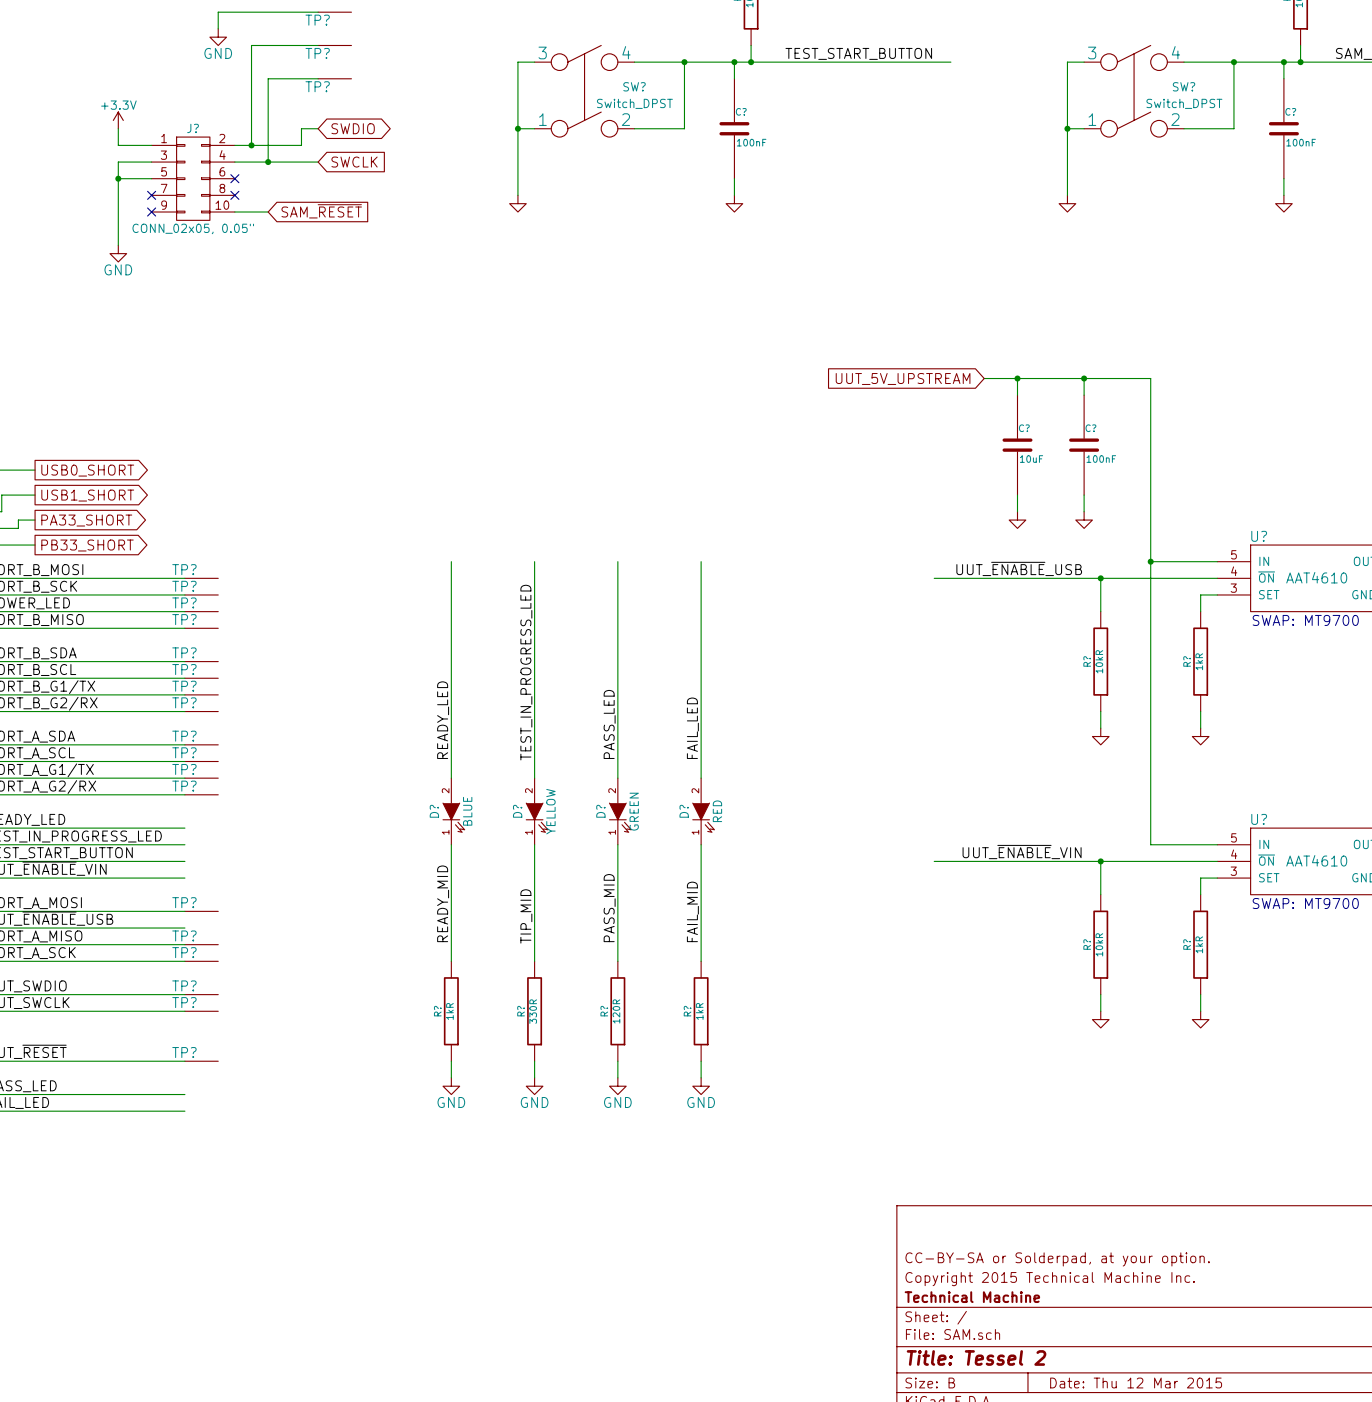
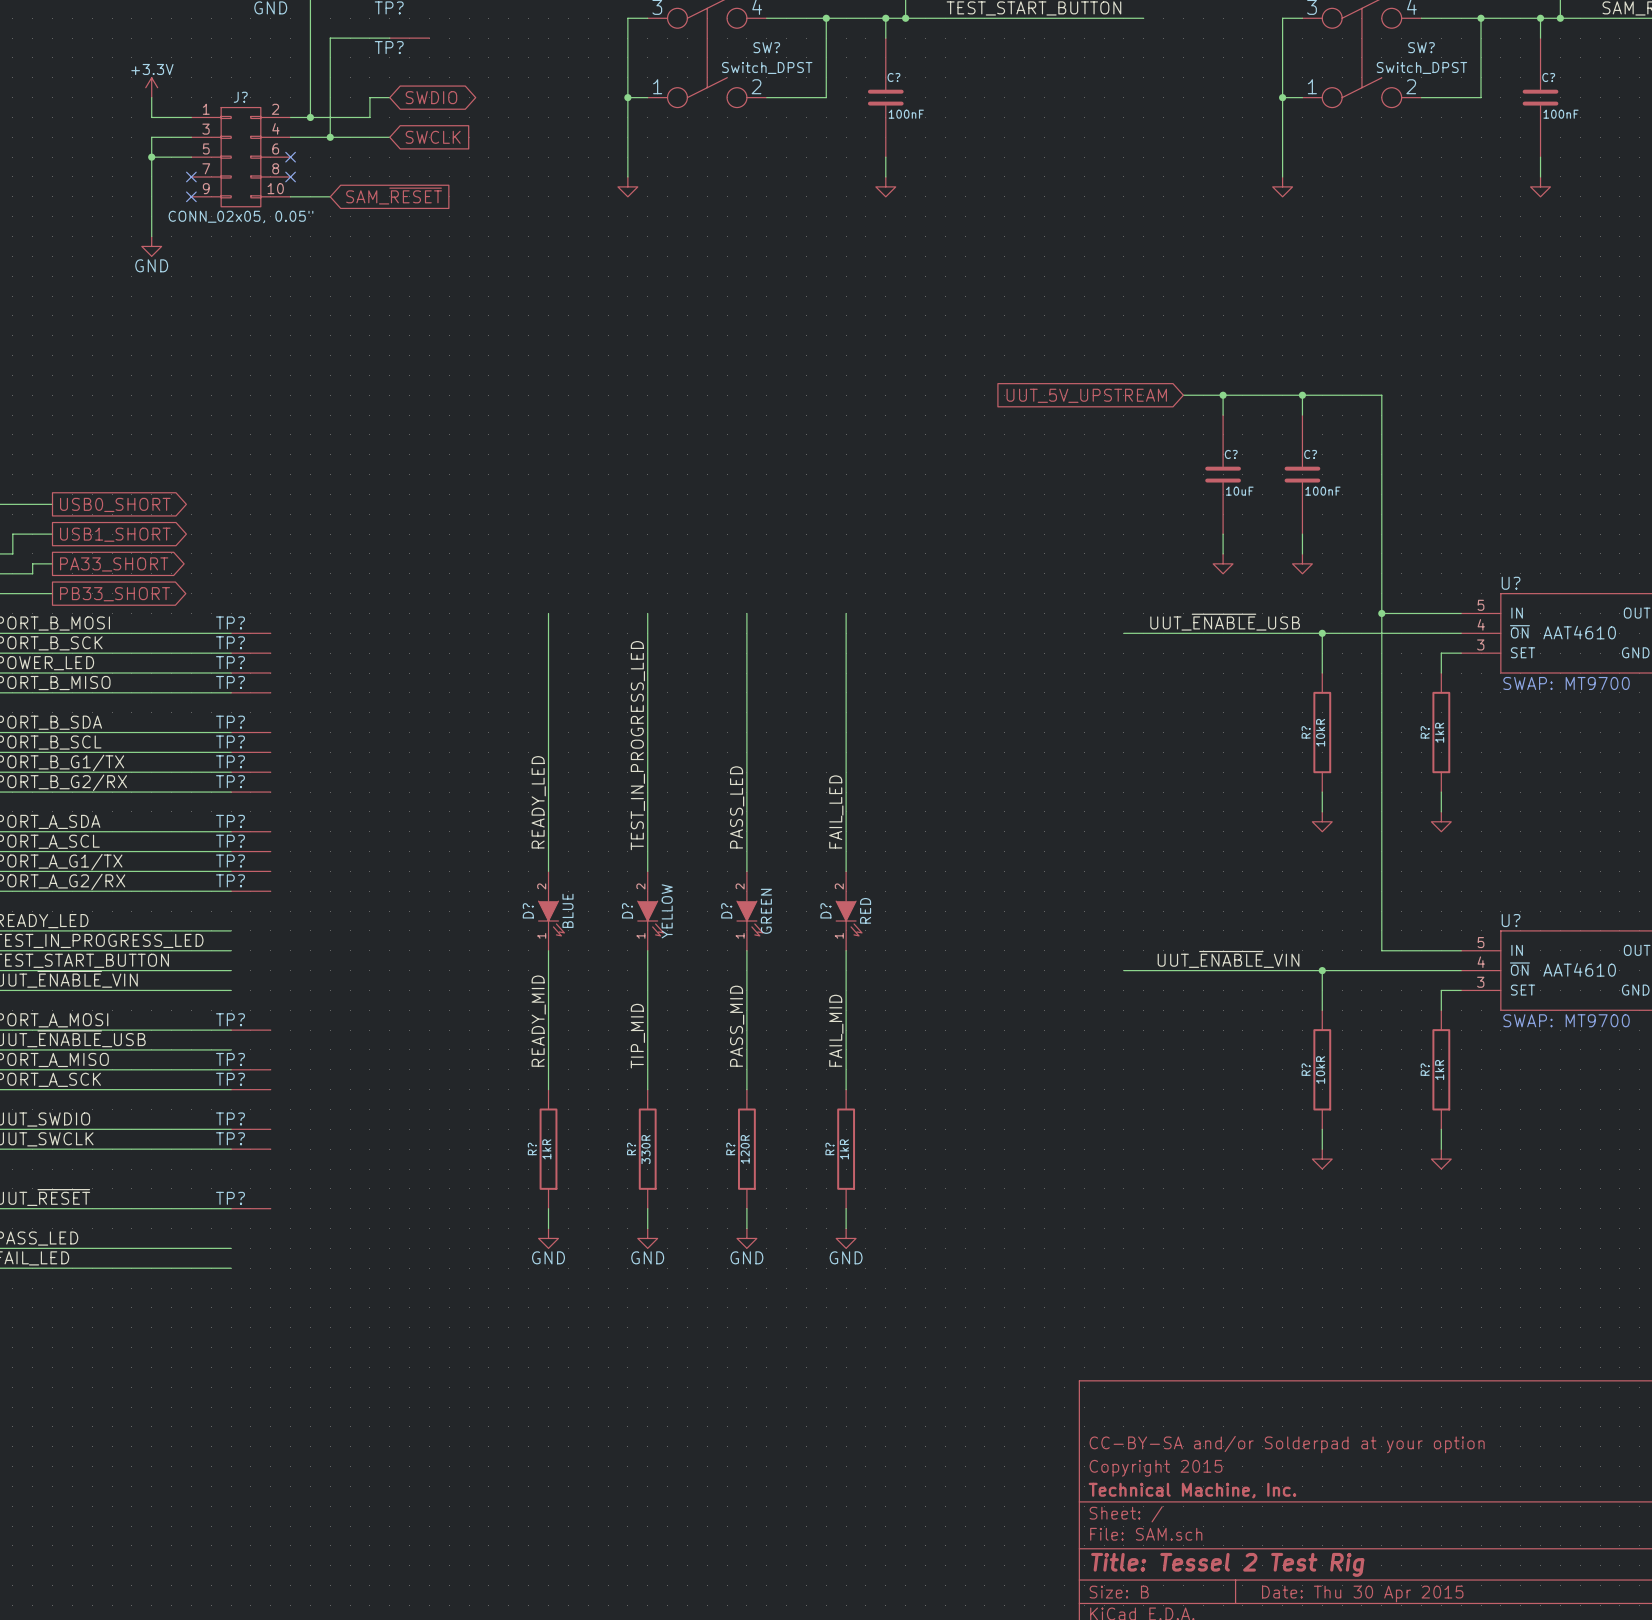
title block: CC-BY-SA or Solderpad, at your option. (1057, 1259) -> CC-BY-SA and/or Solderpad at your option (1287, 1444)
title block: Copyright 2015 Technical Machine Inc. (1050, 1279) -> Copyright 2015 (1156, 1468)
title block: Technical Machine (972, 1297) -> Technical Machine, Inc. (1192, 1490)
title block: Title: Tessel 2 (976, 1357) -> Title: Tessel 2 Test Rig (1227, 1564)
title block: Date: Thu 12 Mar 2015 (1136, 1383) -> Date: Thu 30 Apr 2015 (1362, 1594)

